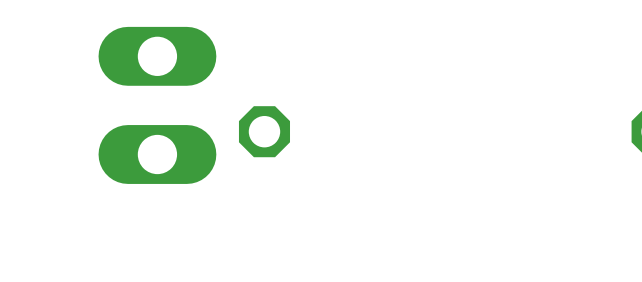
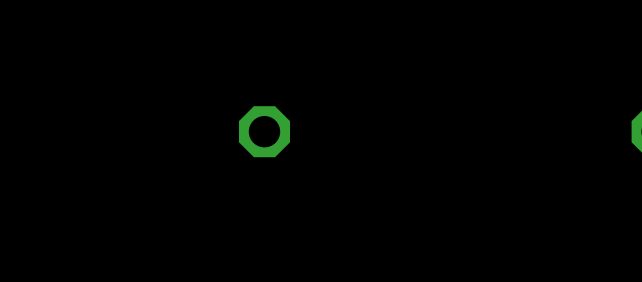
part: (157, 105) -> none

